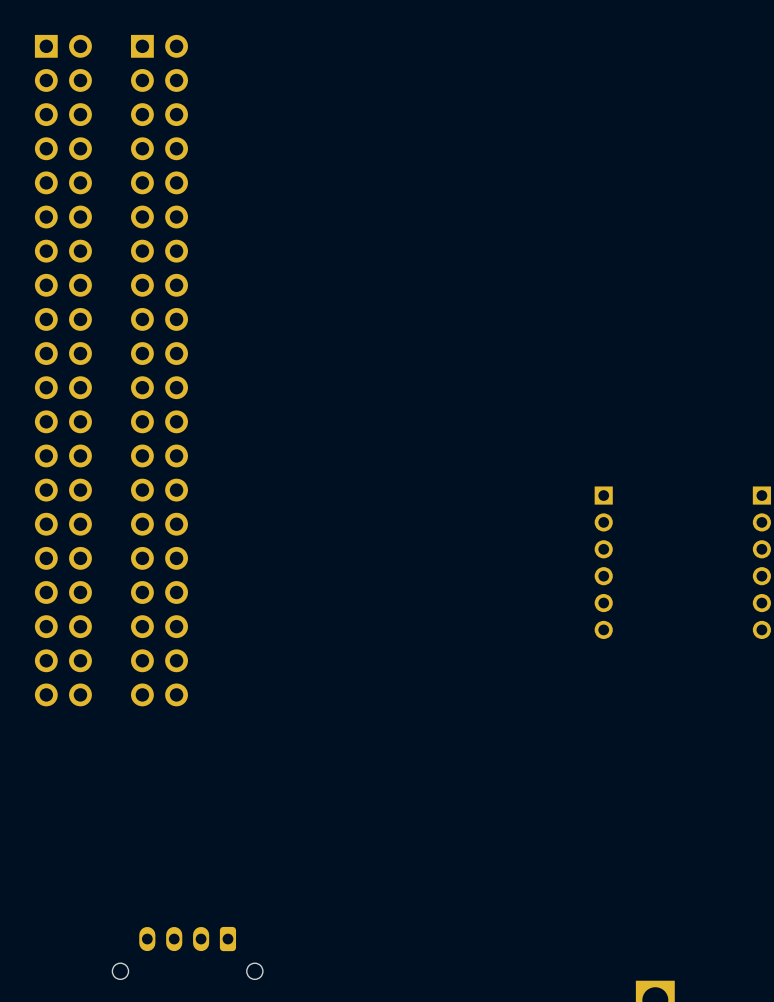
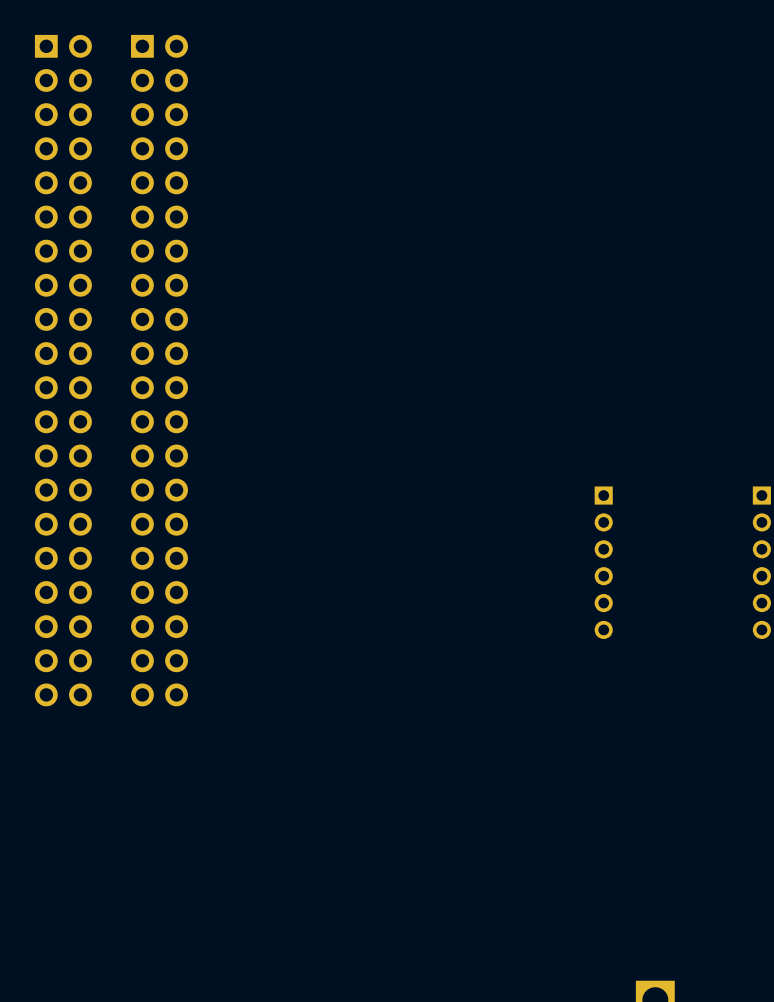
part: (187, 953) -> none

